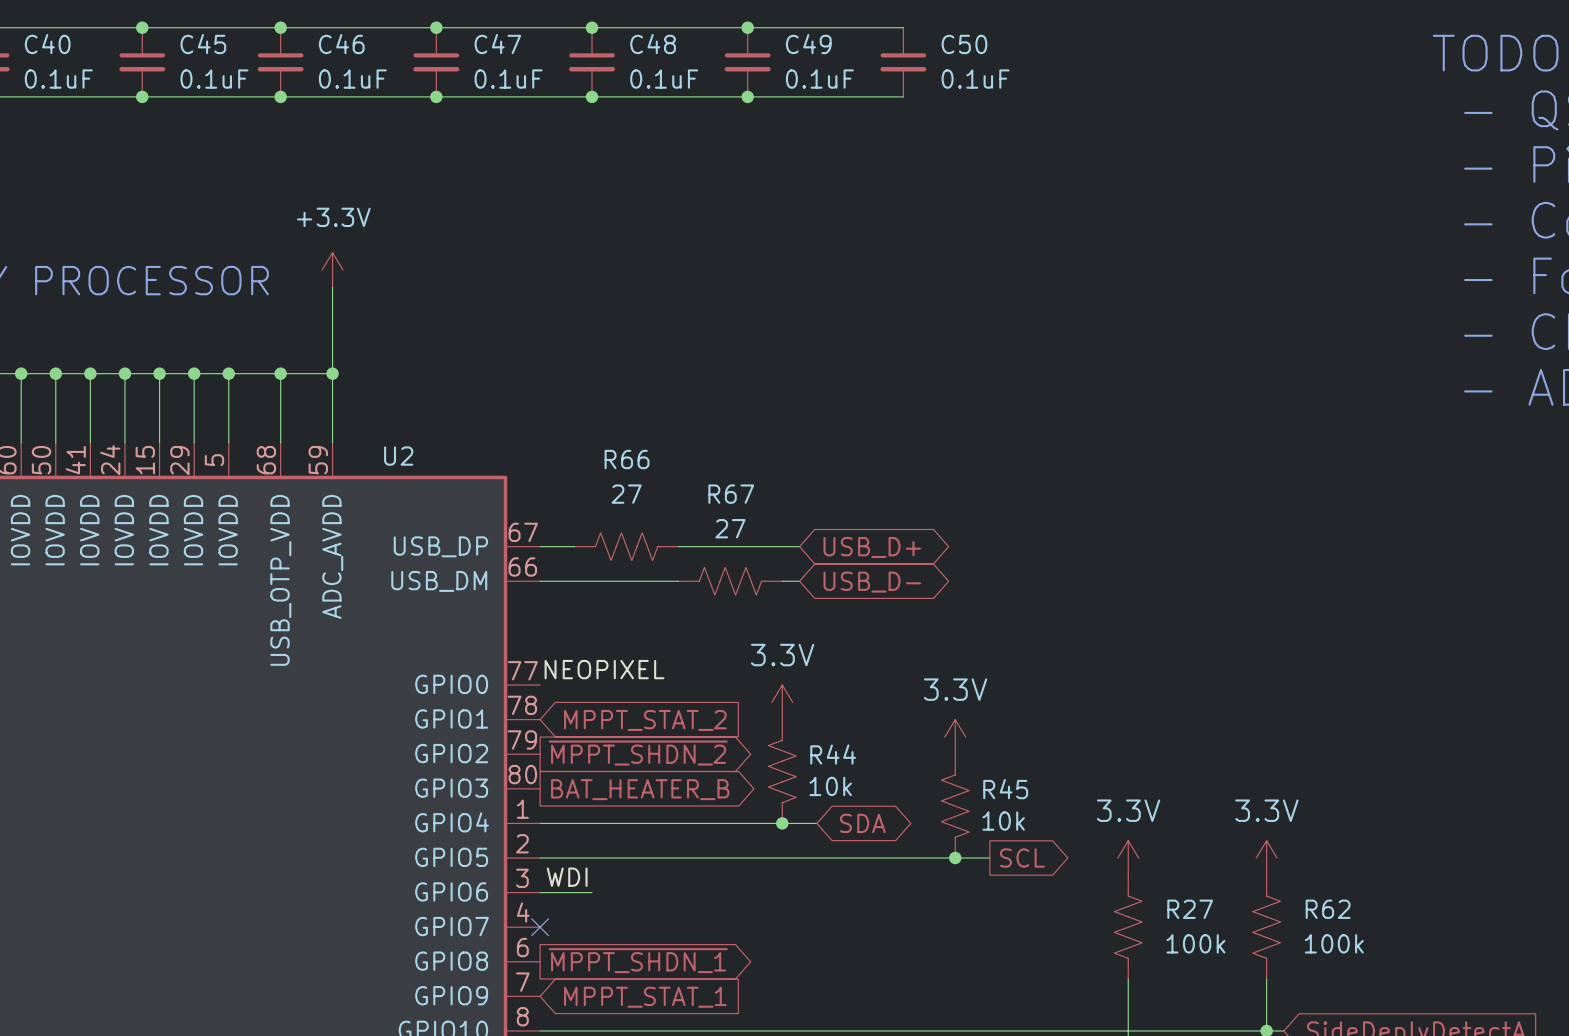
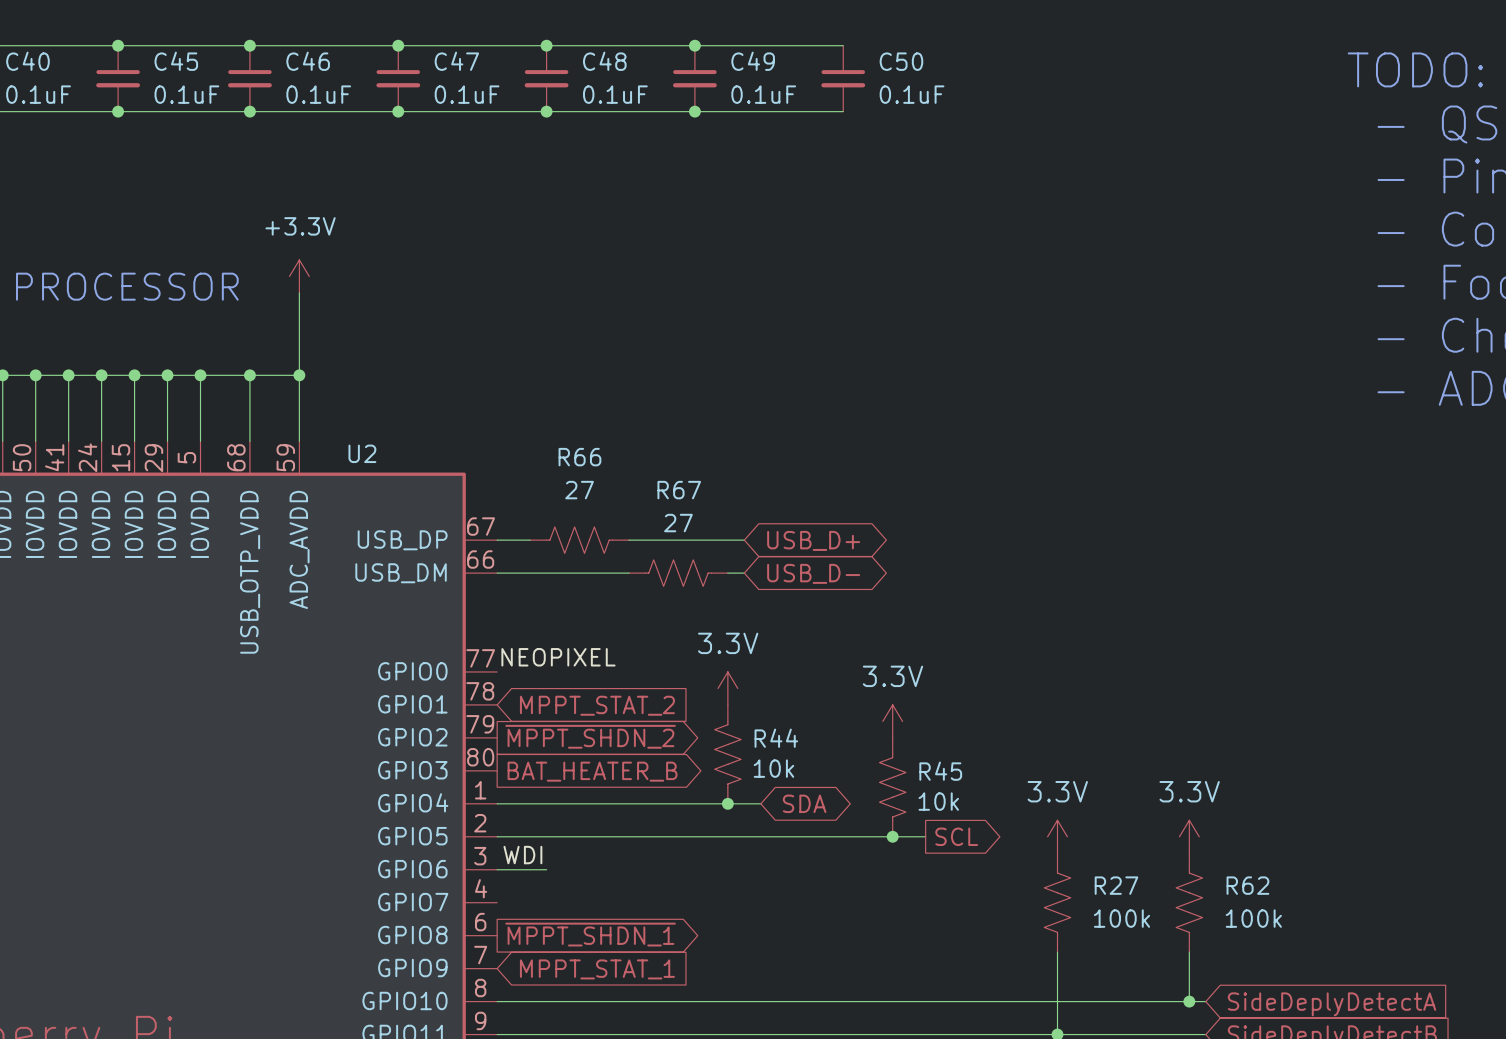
no-connect mark: (540, 927) -> none

